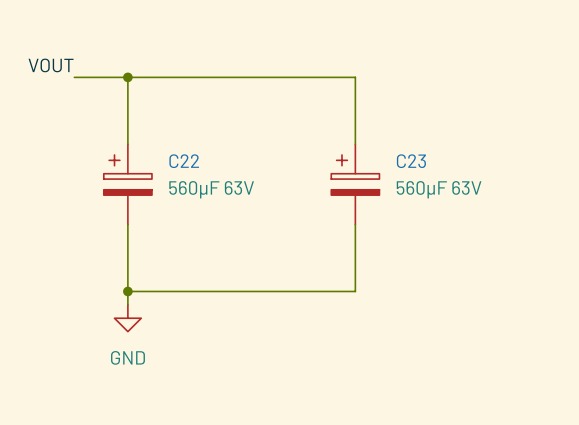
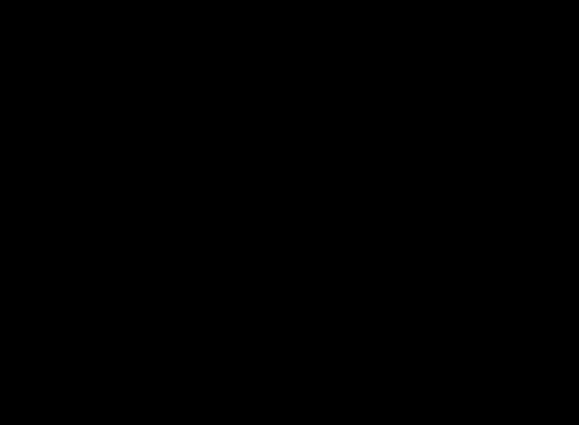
label: VOUT (51, 65) -> none
wire: (74, 77) (355, 77) (355, 144) -> none
wire: (127, 77) (127, 144) -> none
junction: (127, 77) -> none
C22: 560µF 63V (127, 184) -> none
C23: 560µF 63V (355, 184) -> none
wire: (127, 224) (127, 304) -> none
wire: (355, 224) (355, 291) (127, 291) -> none
junction: (127, 291) -> none
power symbol: GND (127, 318) -> none

